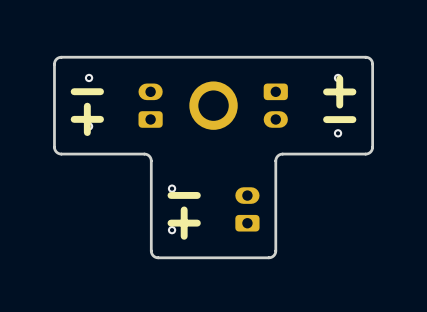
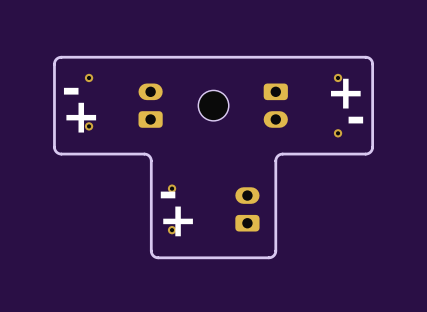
part footprint: [189, 81, 238, 130] -> [198, 90, 229, 121]

